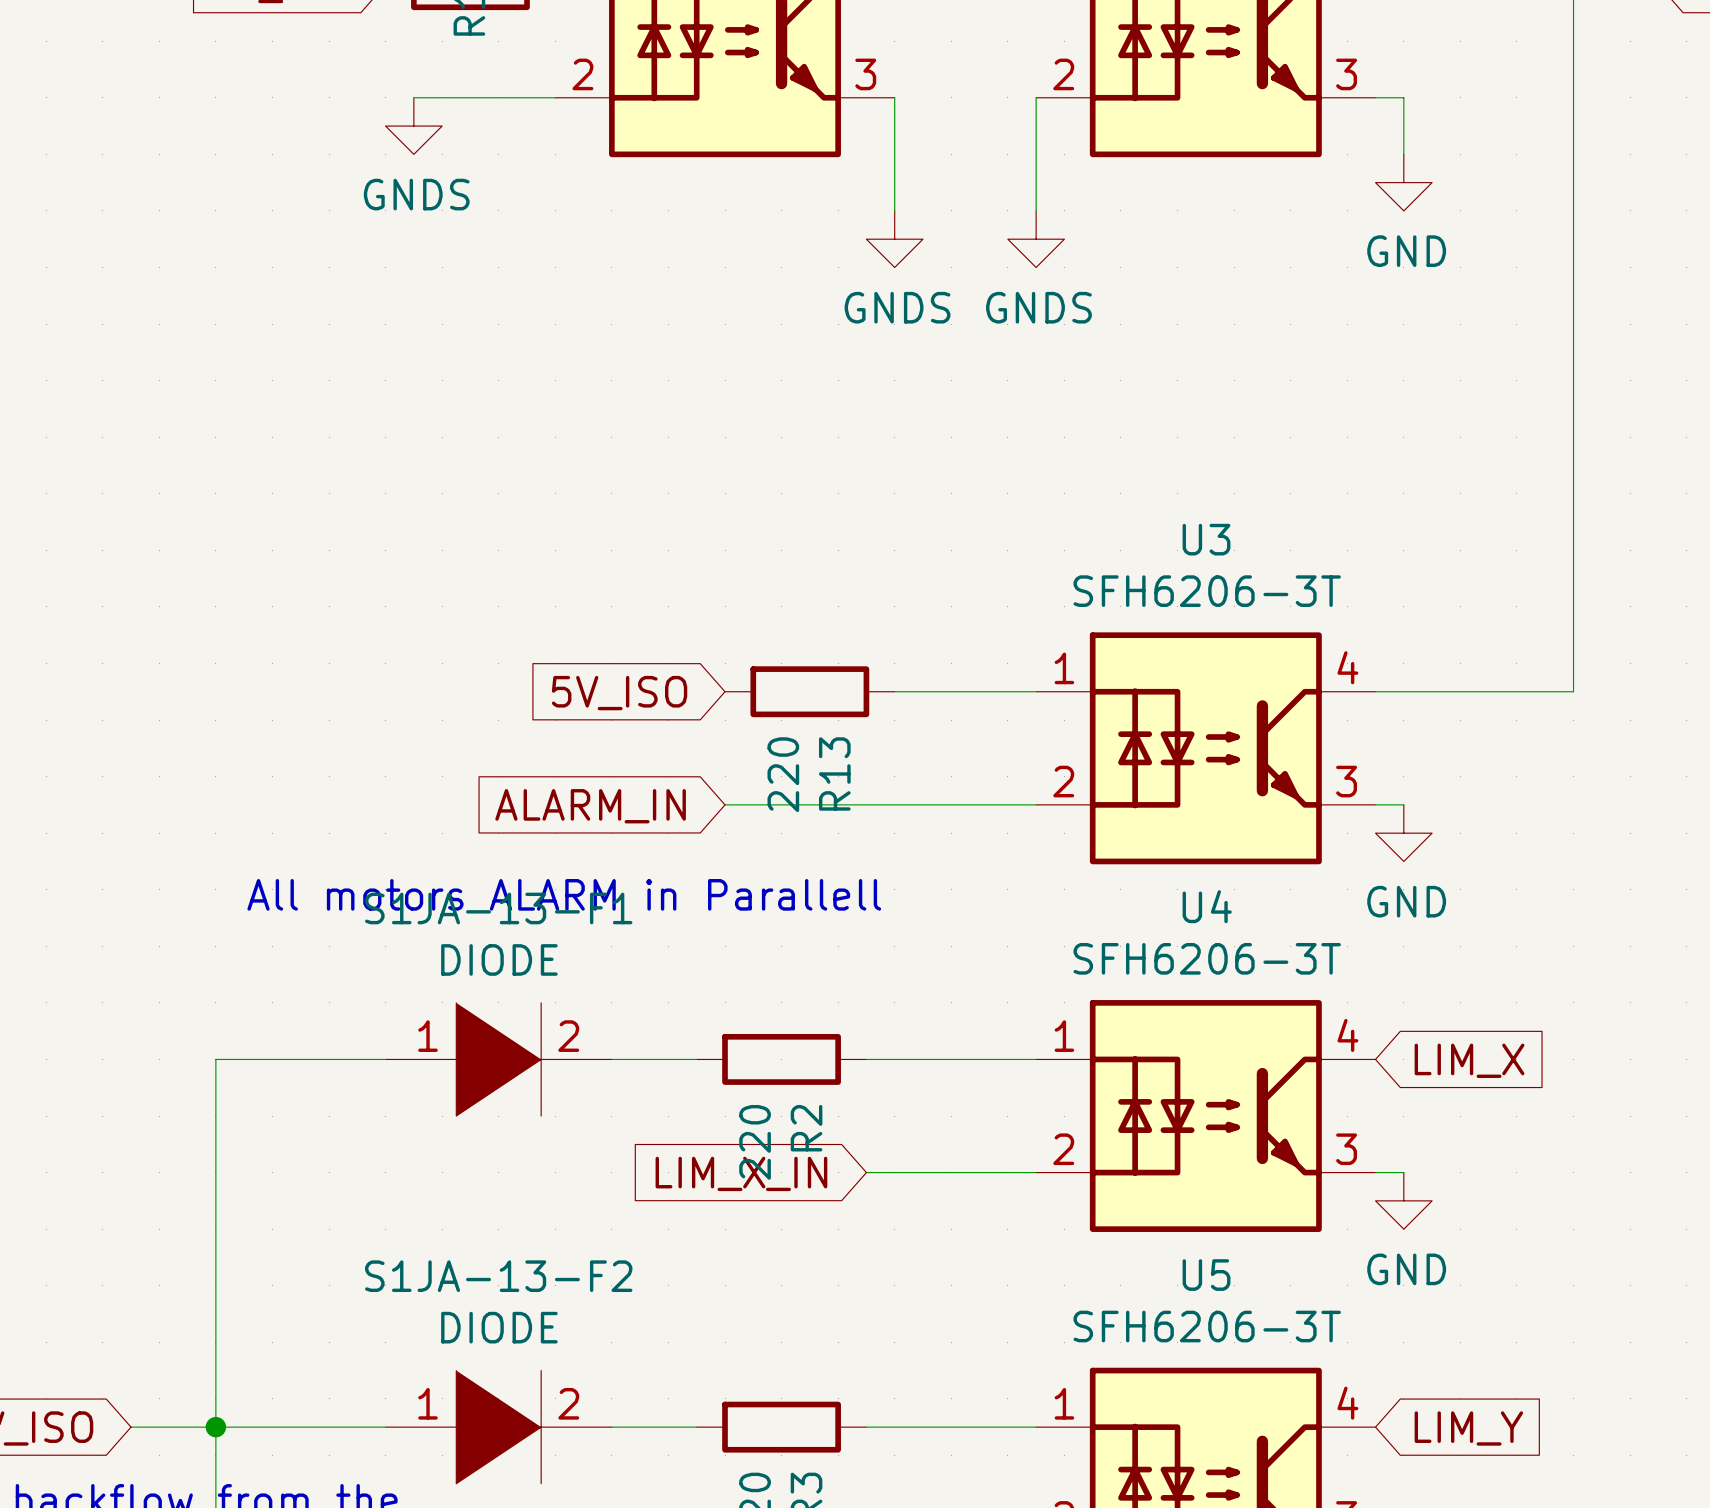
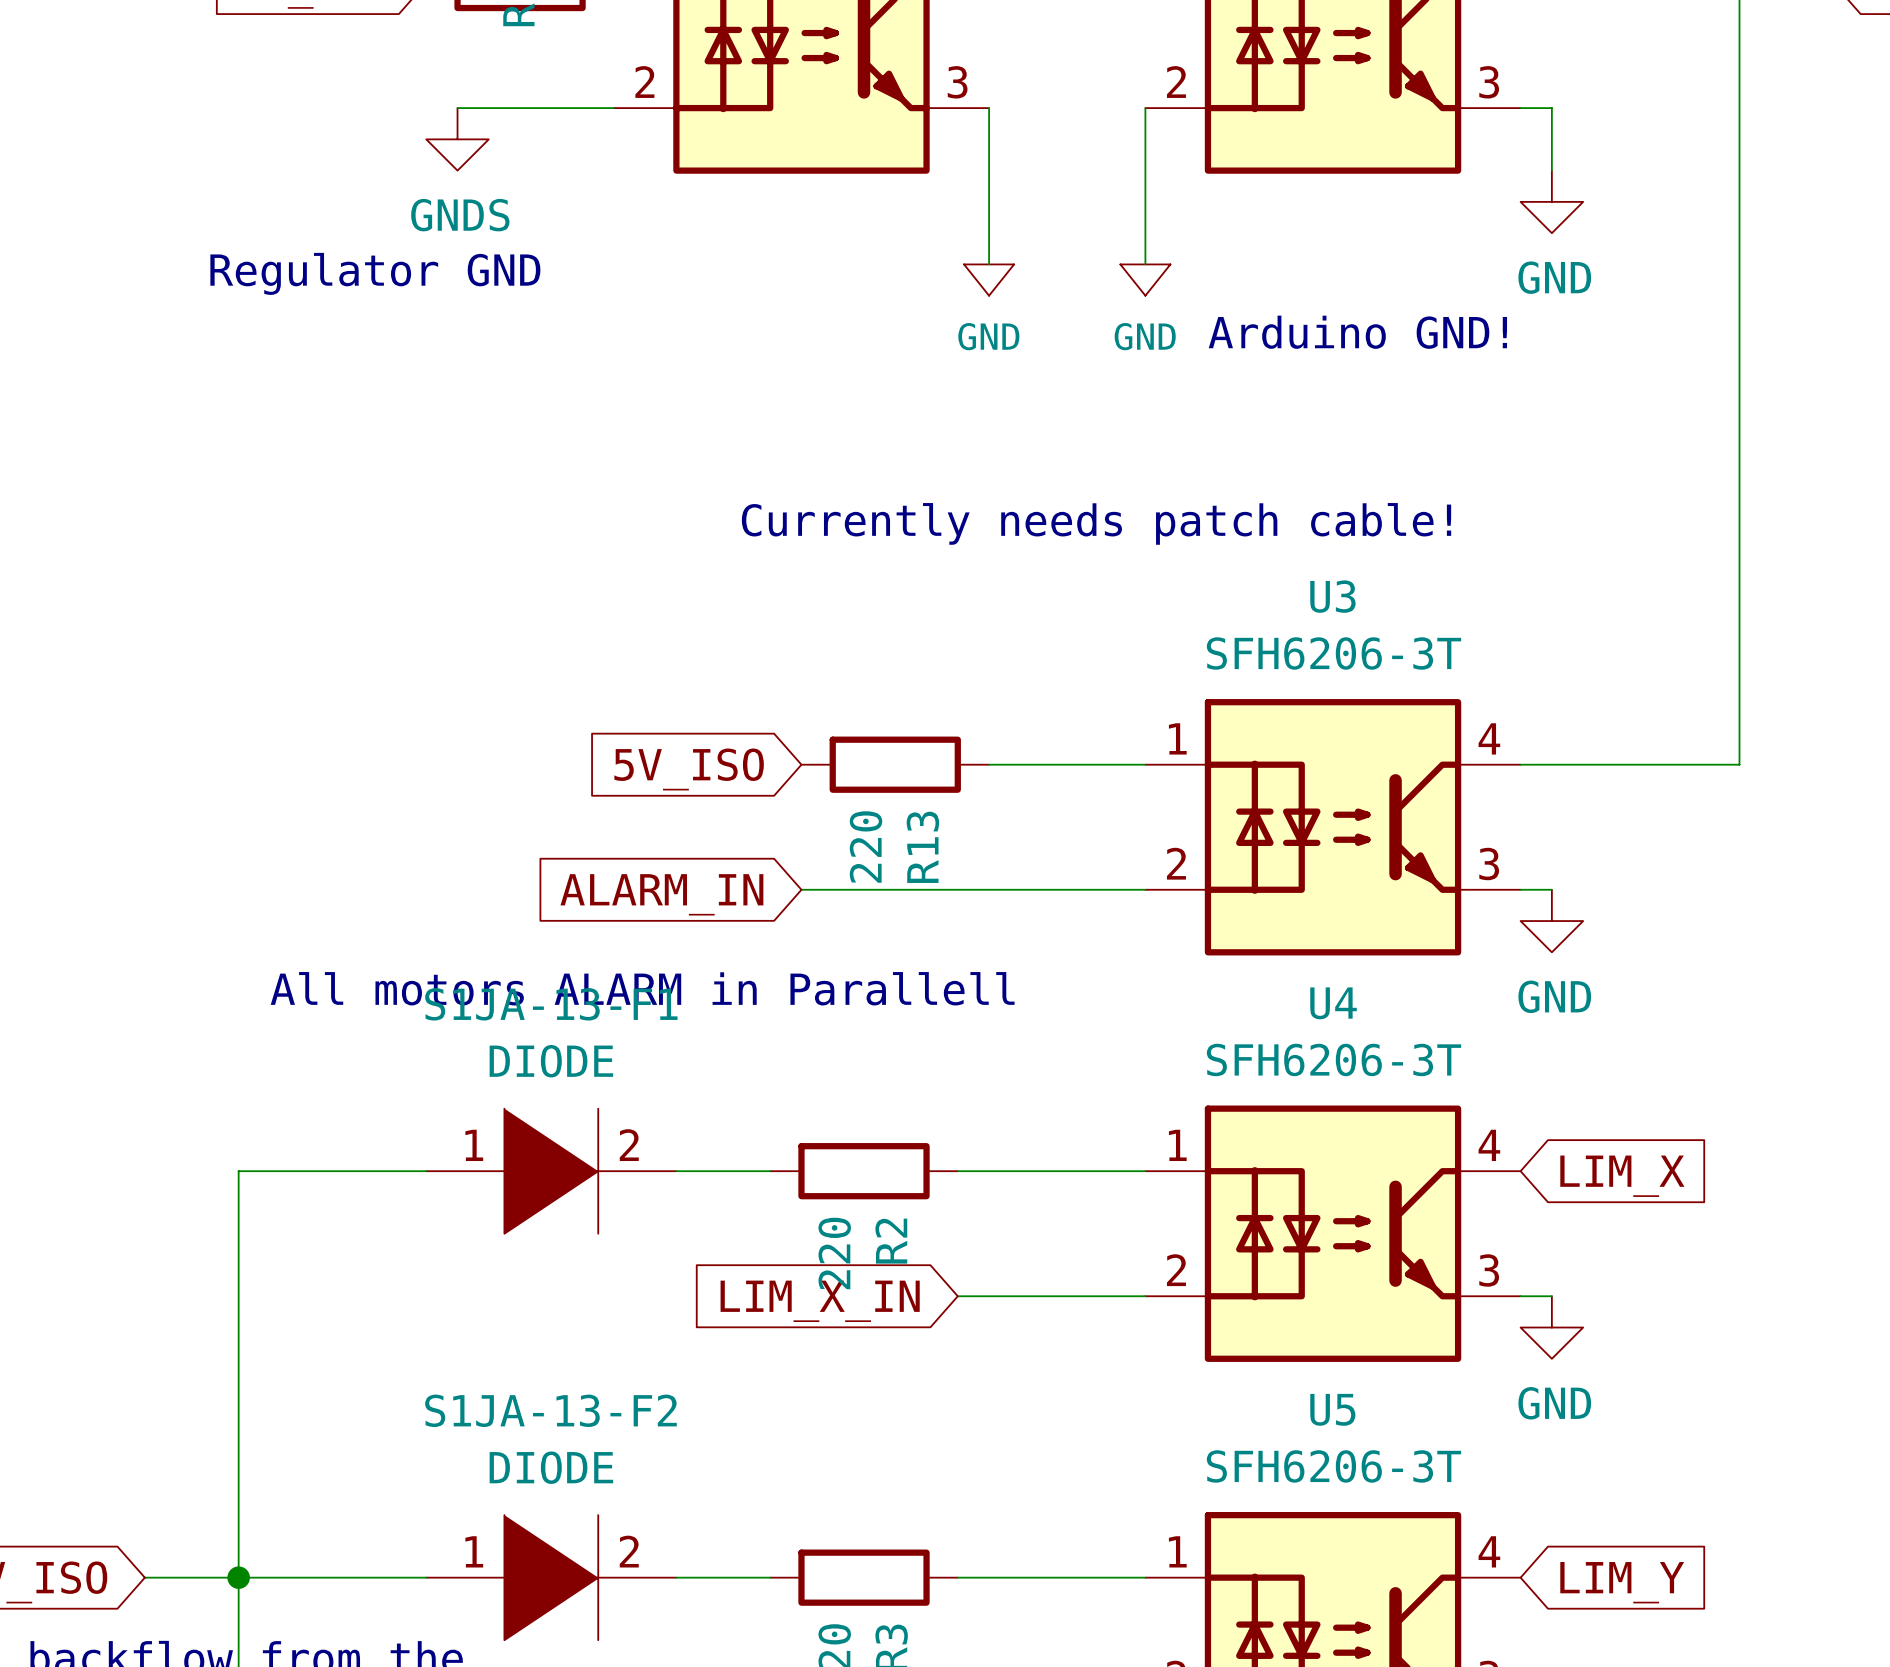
power symbol: GNDS (894, 239) -> GND (989, 280)
power symbol: GNDS (1036, 239) -> GND (1145, 280)
text: none -> Regulator GND (375, 273)
text: none -> Arduino GND! (1357, 332)
text: none -> Currently needs patch cable! (1096, 523)

